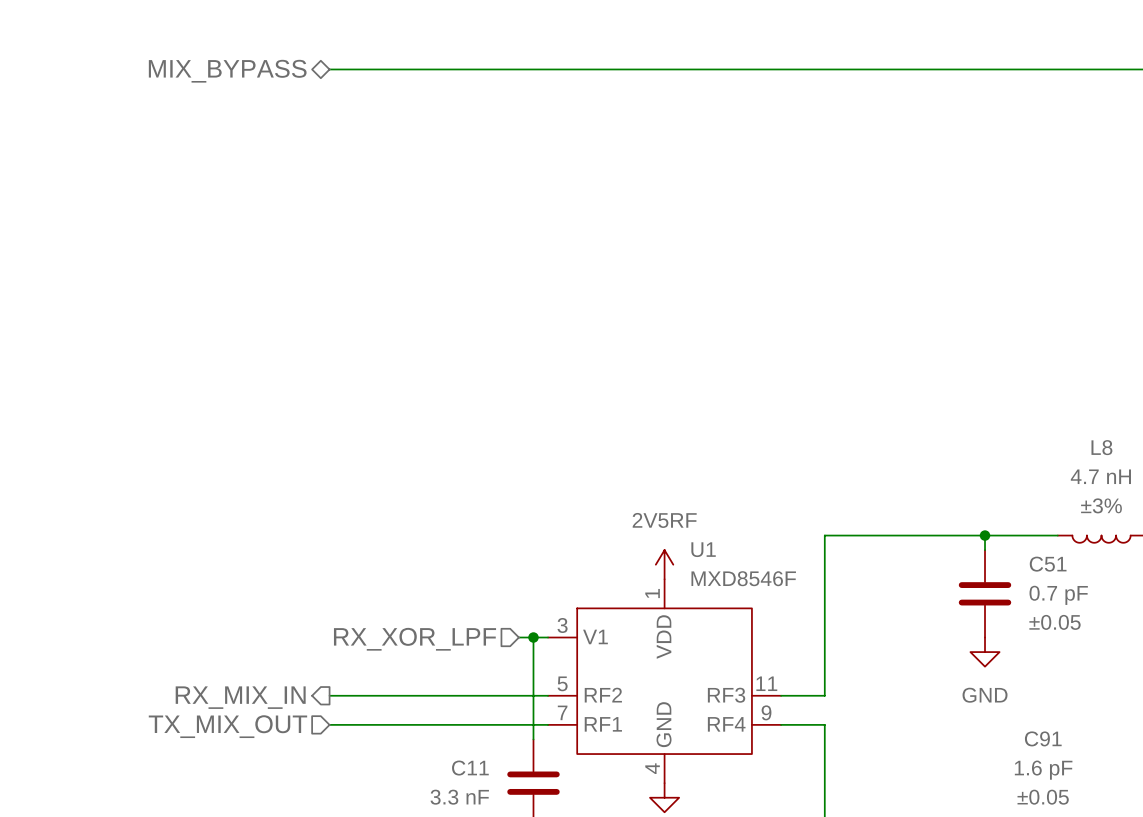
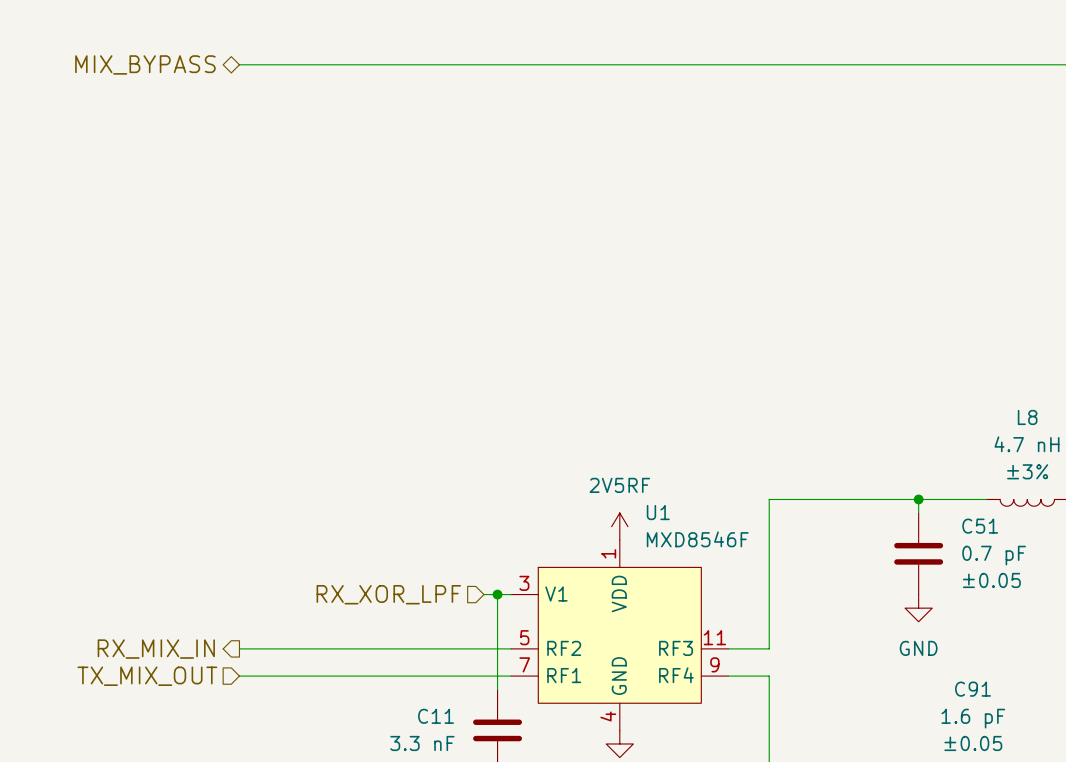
wire: none -> (239, 64) (307, 64)
hierarchical label position: MIX_BYPASS (227, 71) -> MIX_BYPASS (145, 64)
wire: none -> (239, 648) (307, 648)
hierarchical label position: RX_MIX_IN (240, 697) -> RX_MIX_IN (156, 649)
wire: none -> (239, 676) (307, 676)
hierarchical label position: TX_MIX_OUT (227, 726) -> TX_MIX_OUT (147, 676)

